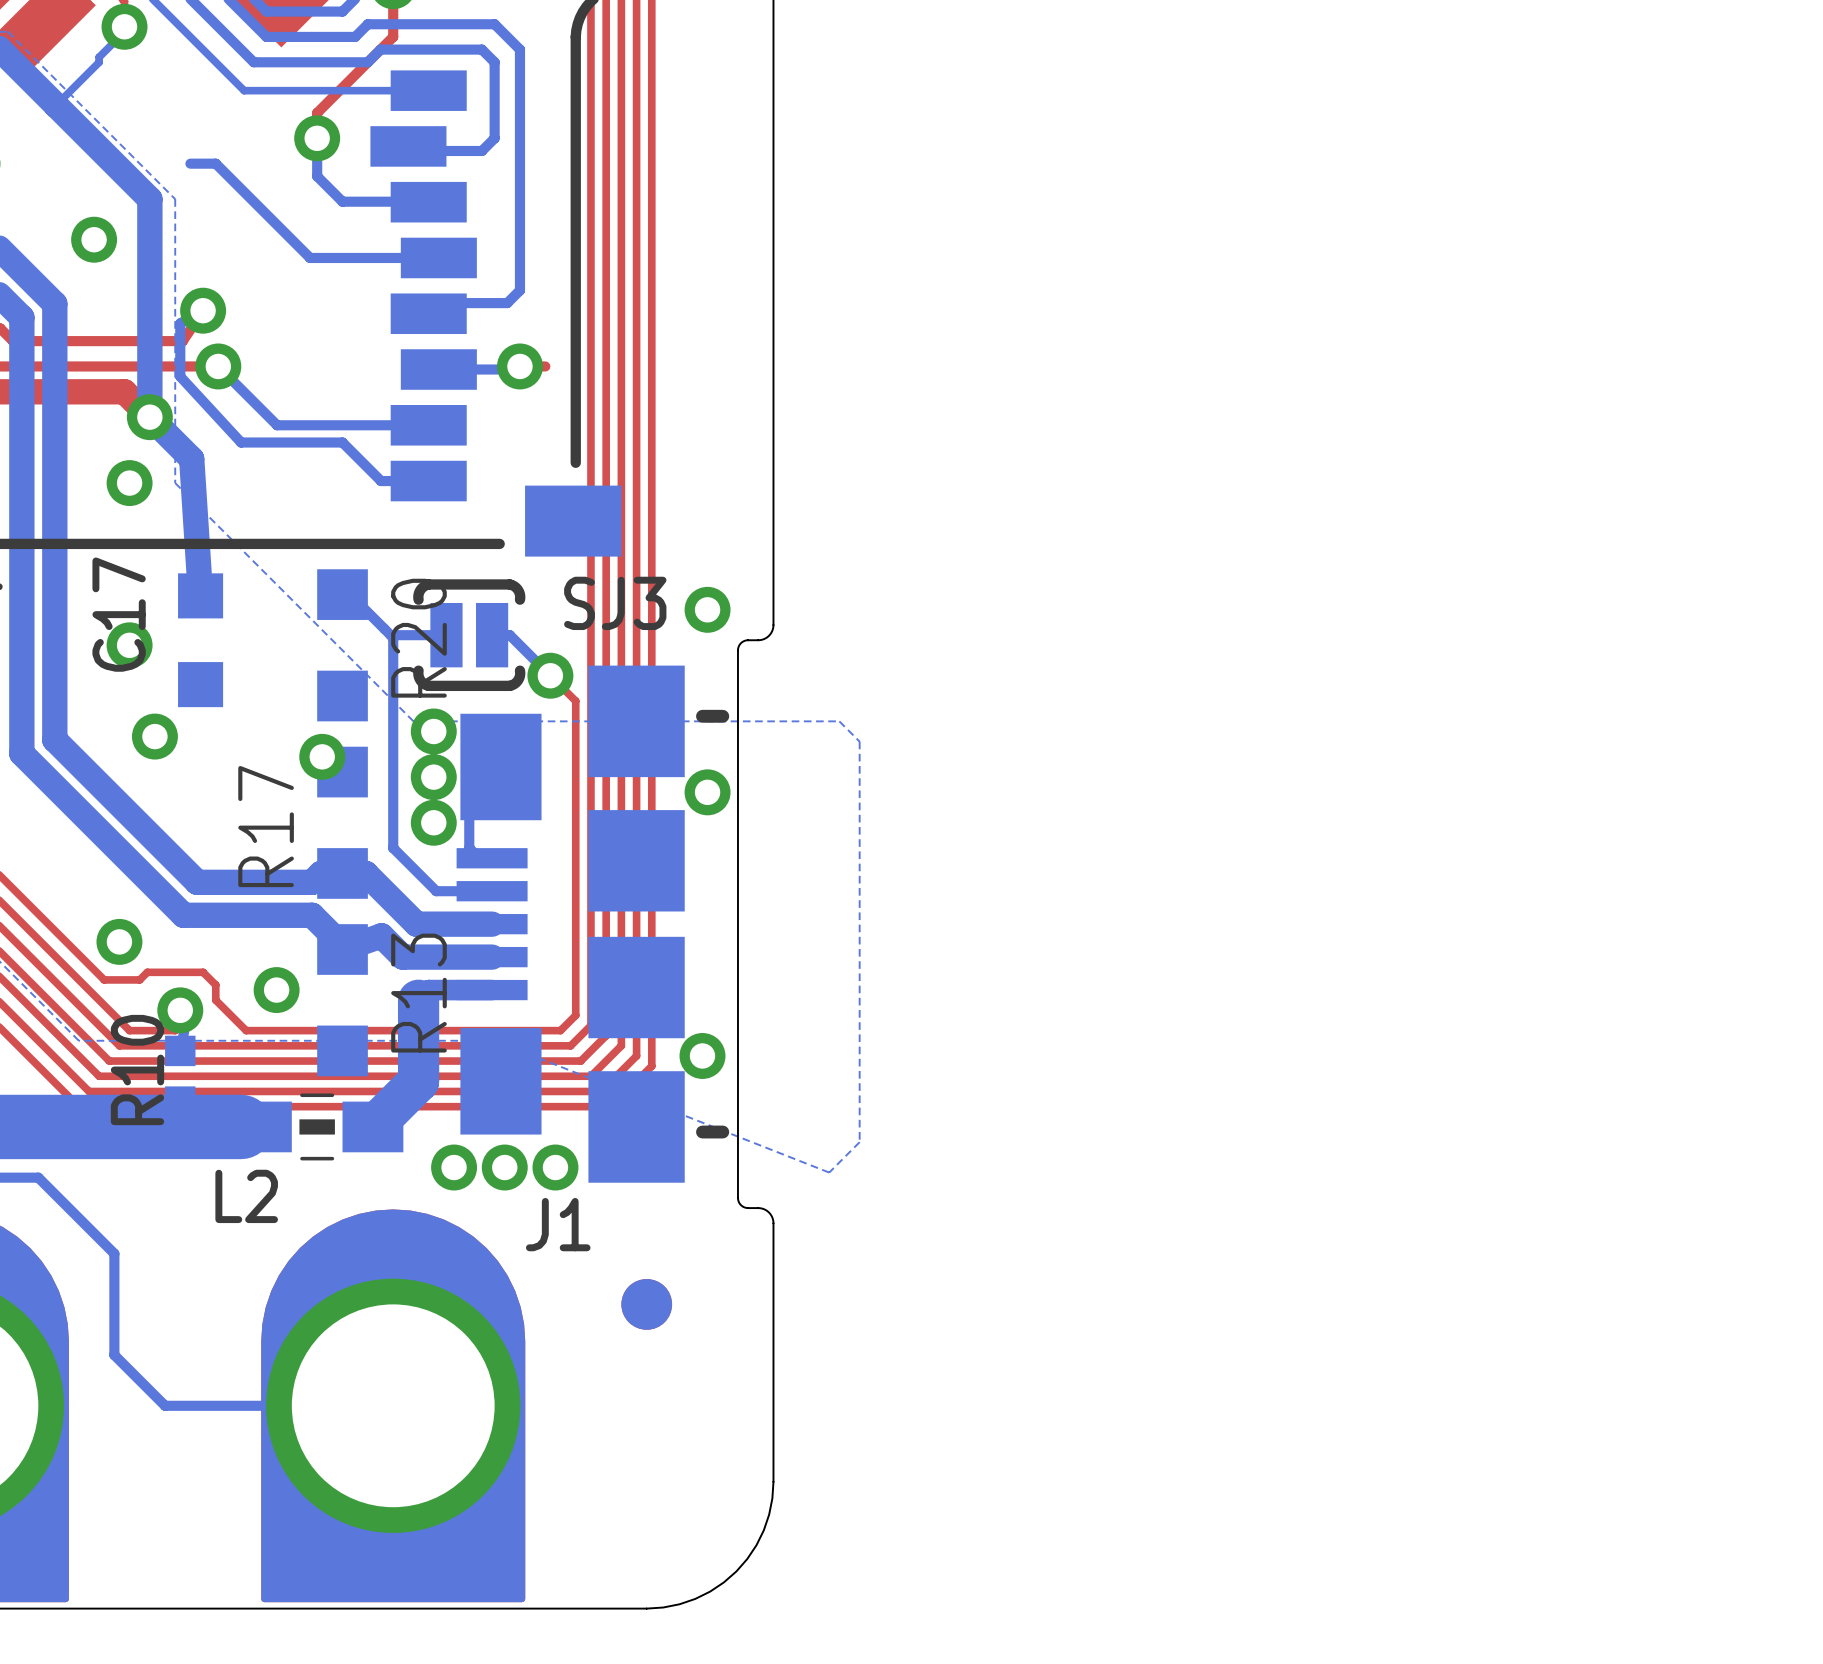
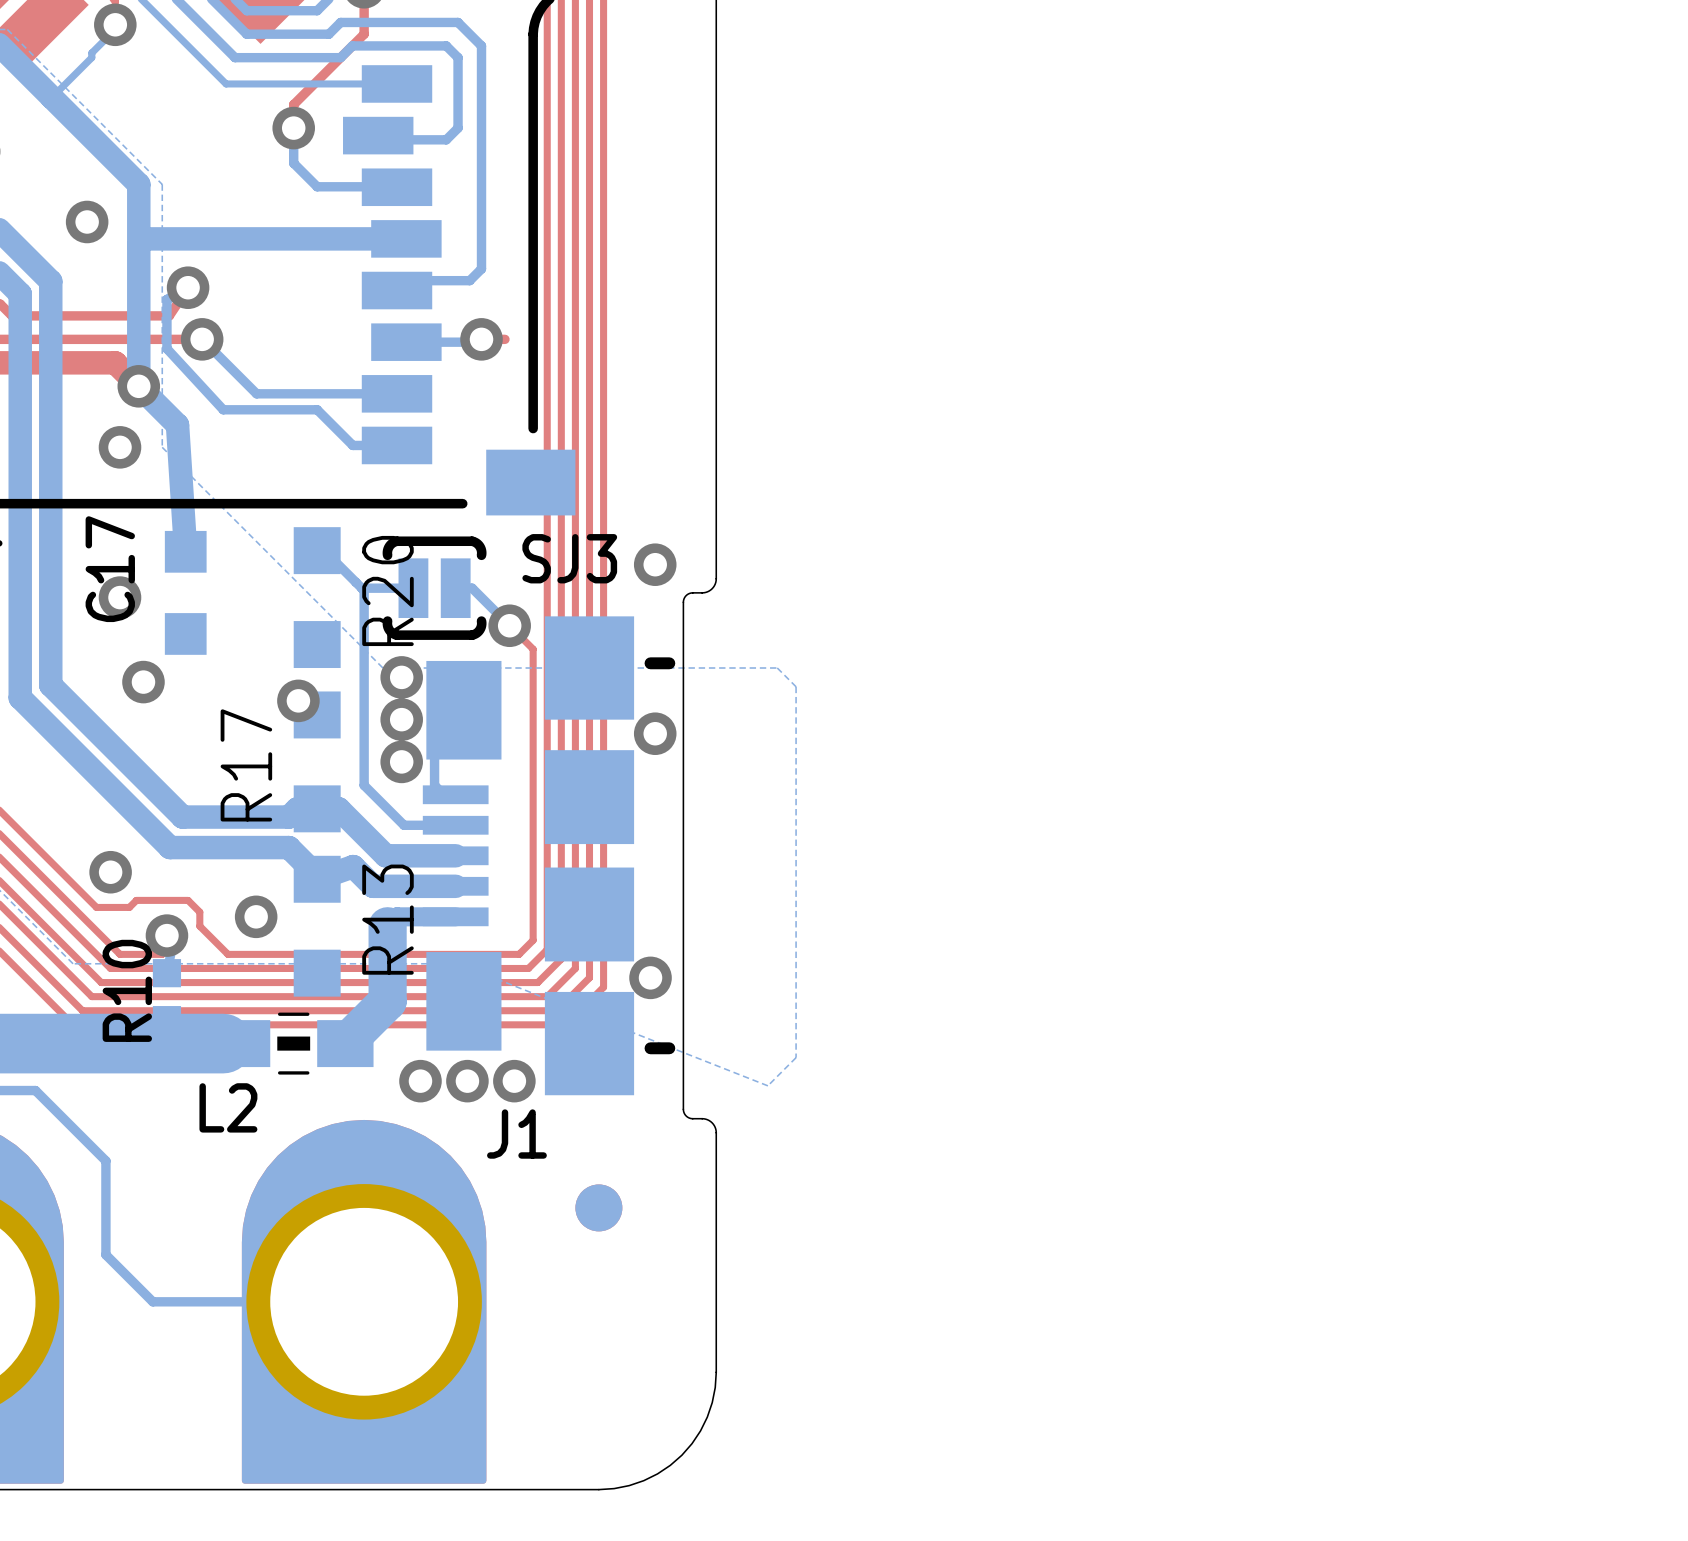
bottom track: (190, 163) (215, 163) (310, 257) -> (138, 245) (145, 238) (287, 238)
bottom track width: thin (438, 257) (310, 257) -> thick (406, 238) (287, 238)

